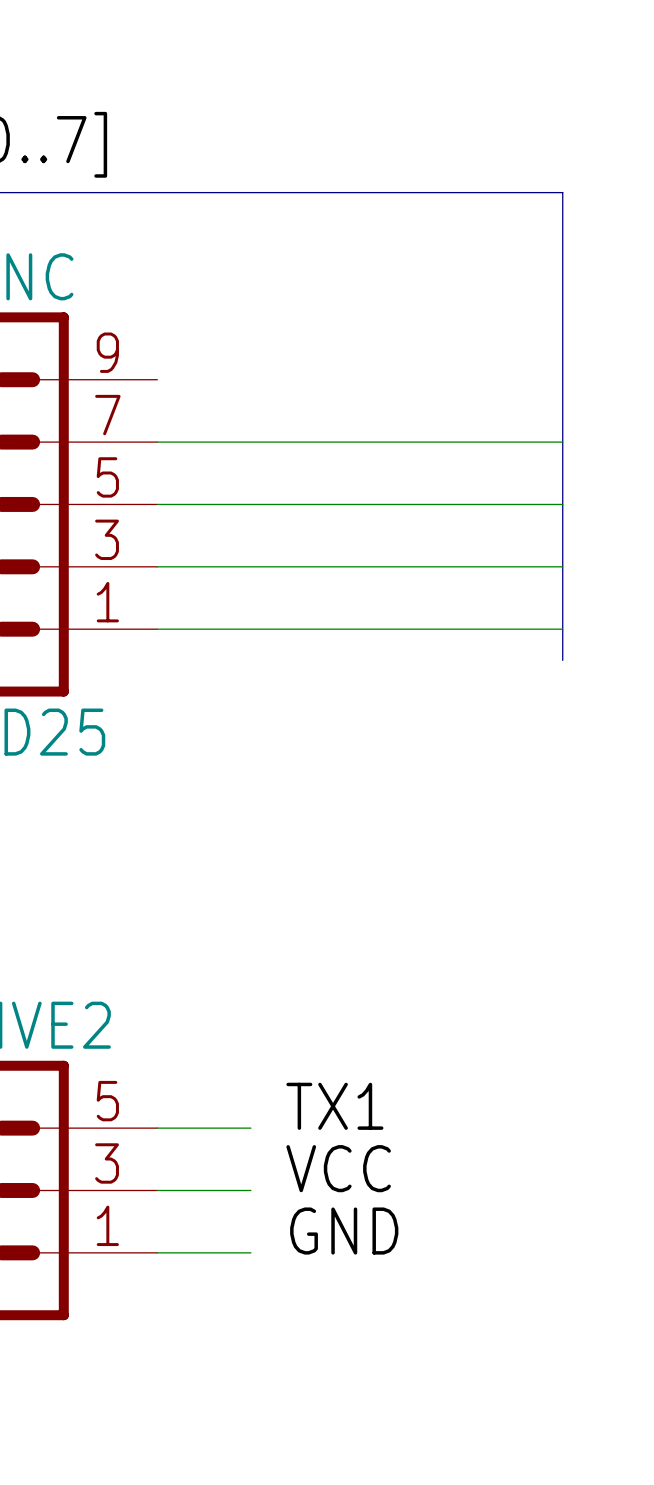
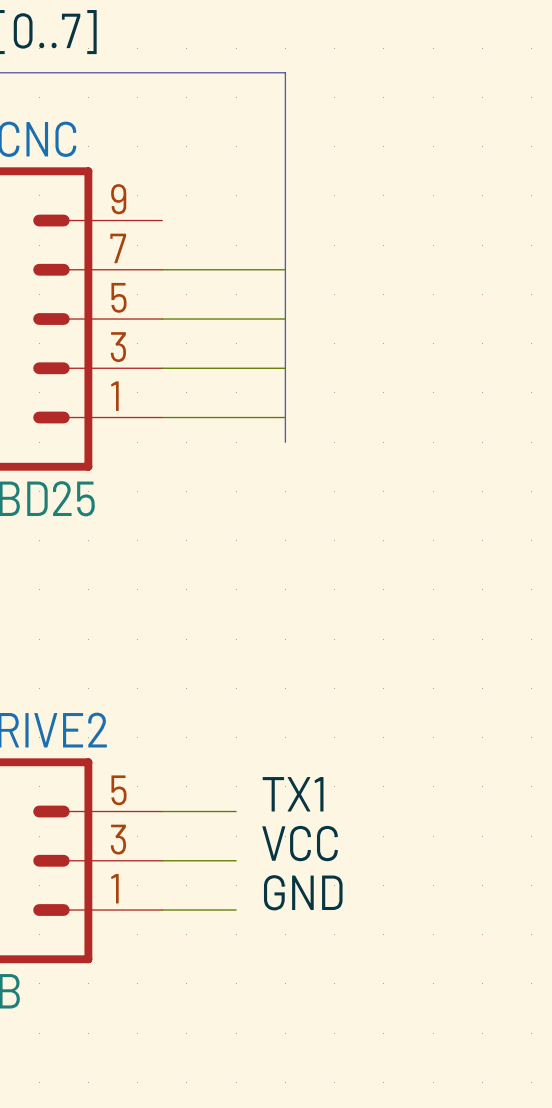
bus: (313, 192) (562, 192) (562, 660) -> (285, 72) (285, 442)
wire: (313, 442) (562, 442) -> none
wire: (313, 504) (562, 504) -> none
wire: (313, 566) (562, 566) -> none
wire: (313, 629) (562, 629) -> none

